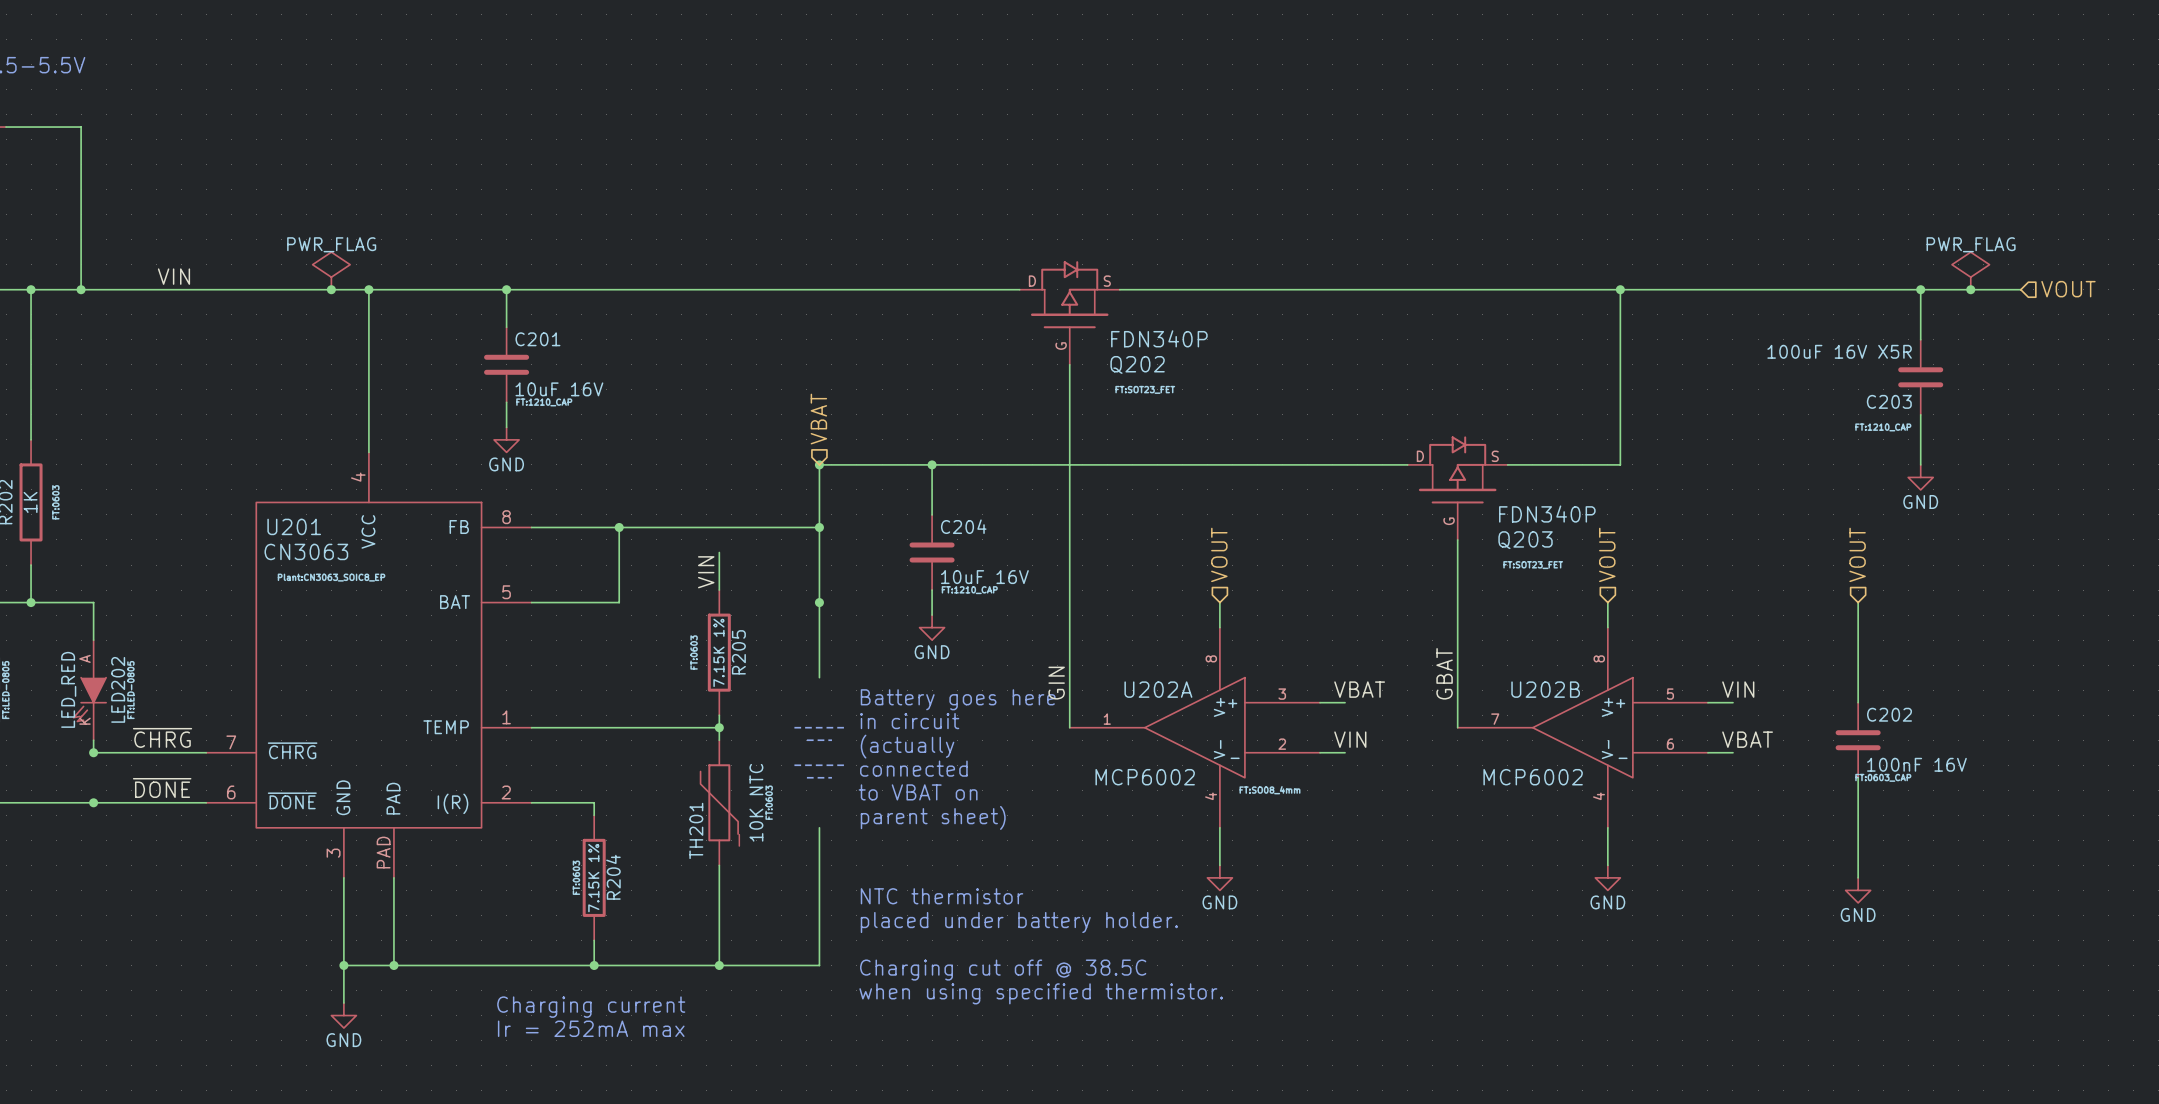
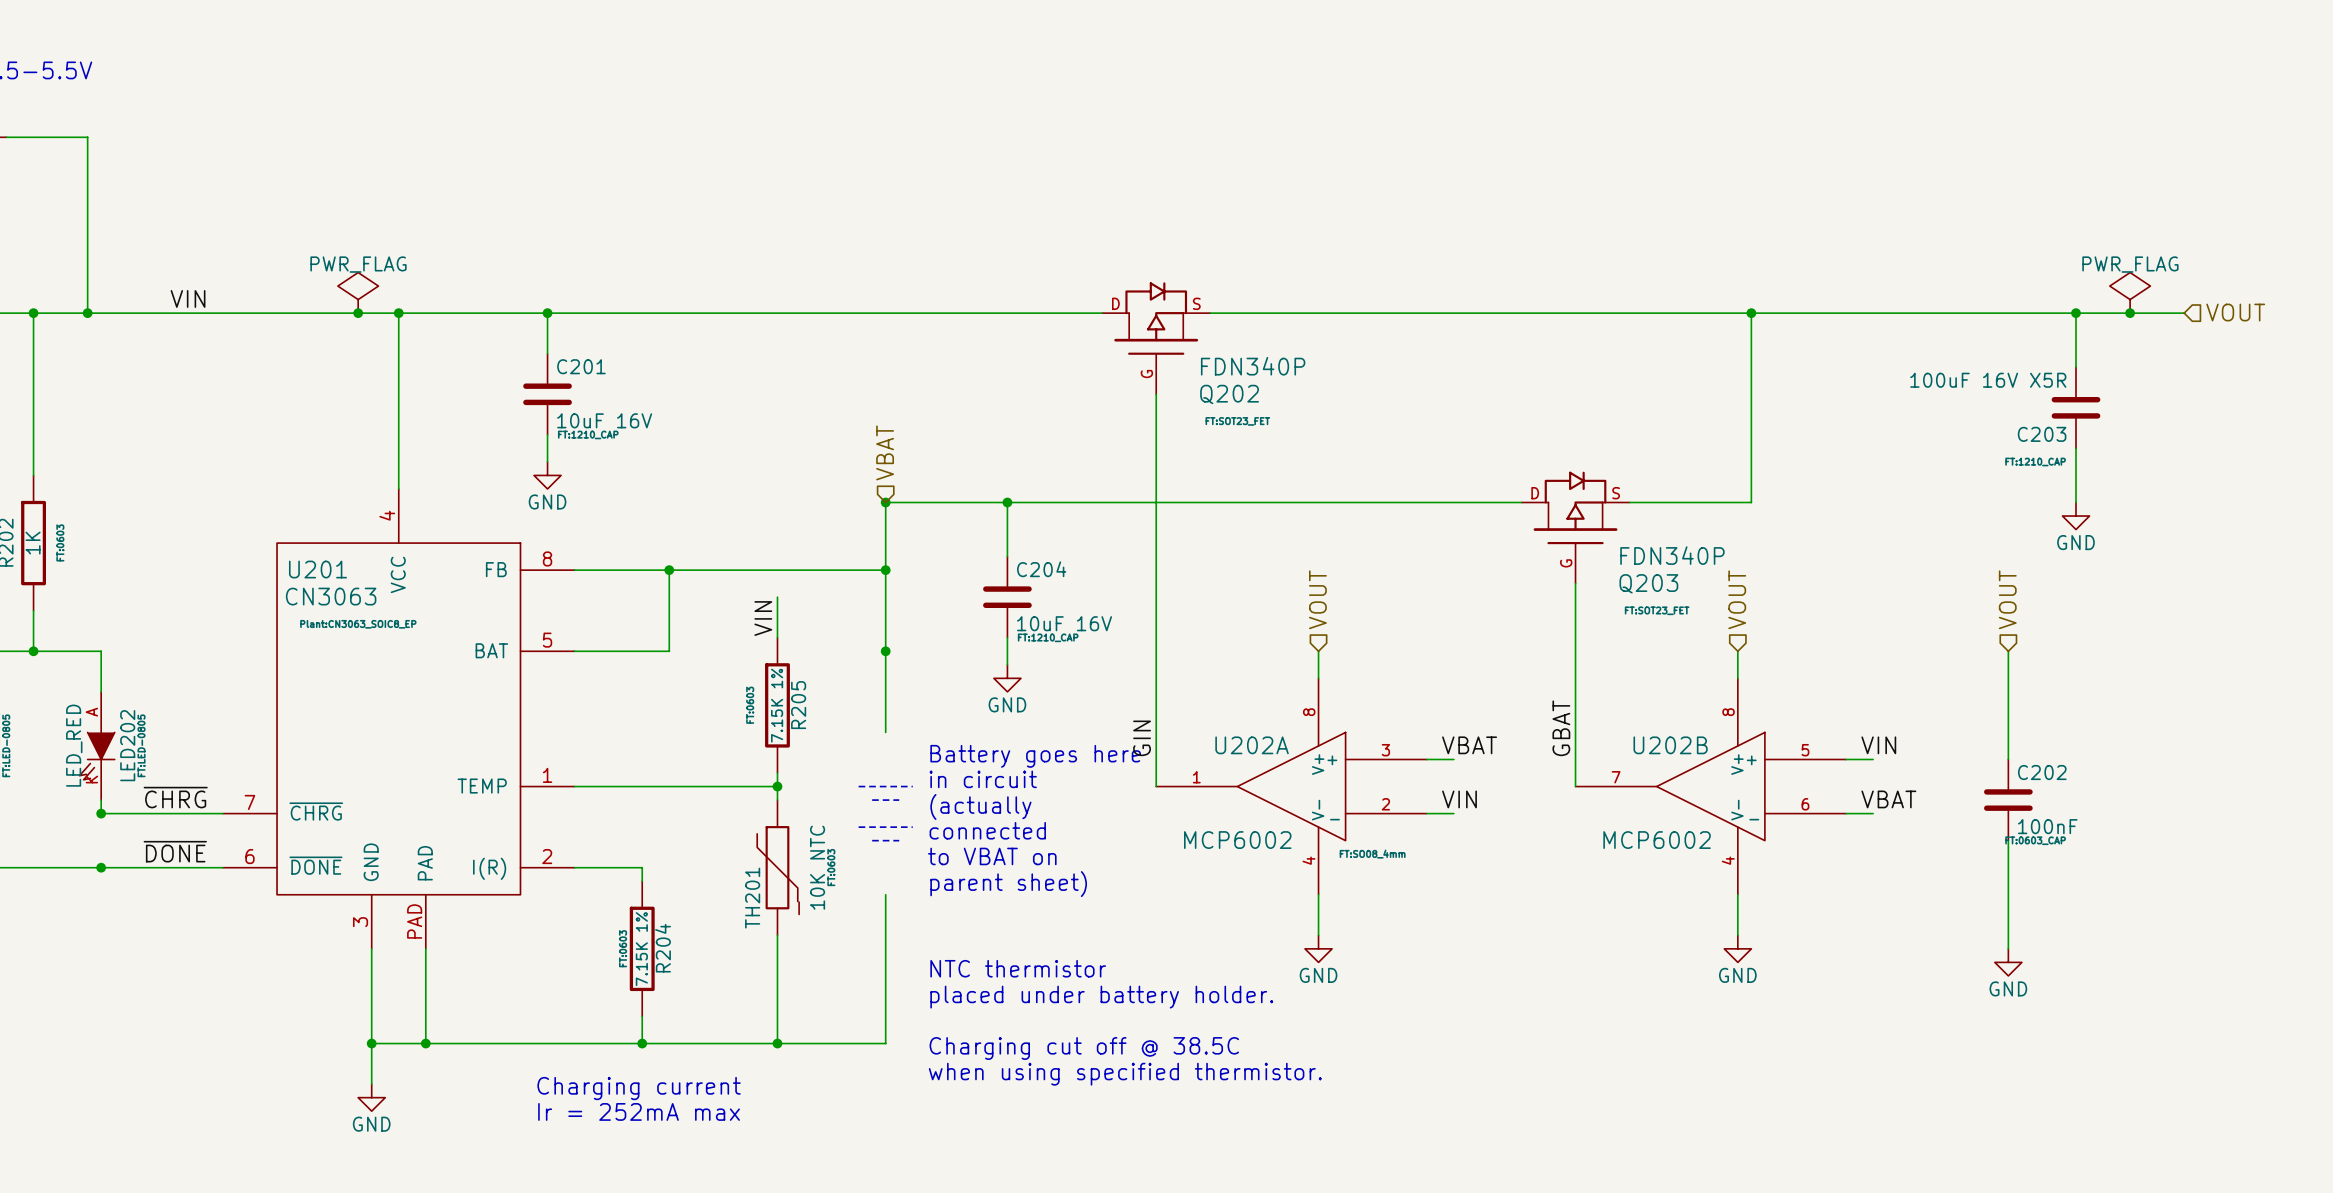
C202 value: 100nF 16V (1916, 764) -> 100nF (2047, 826)

